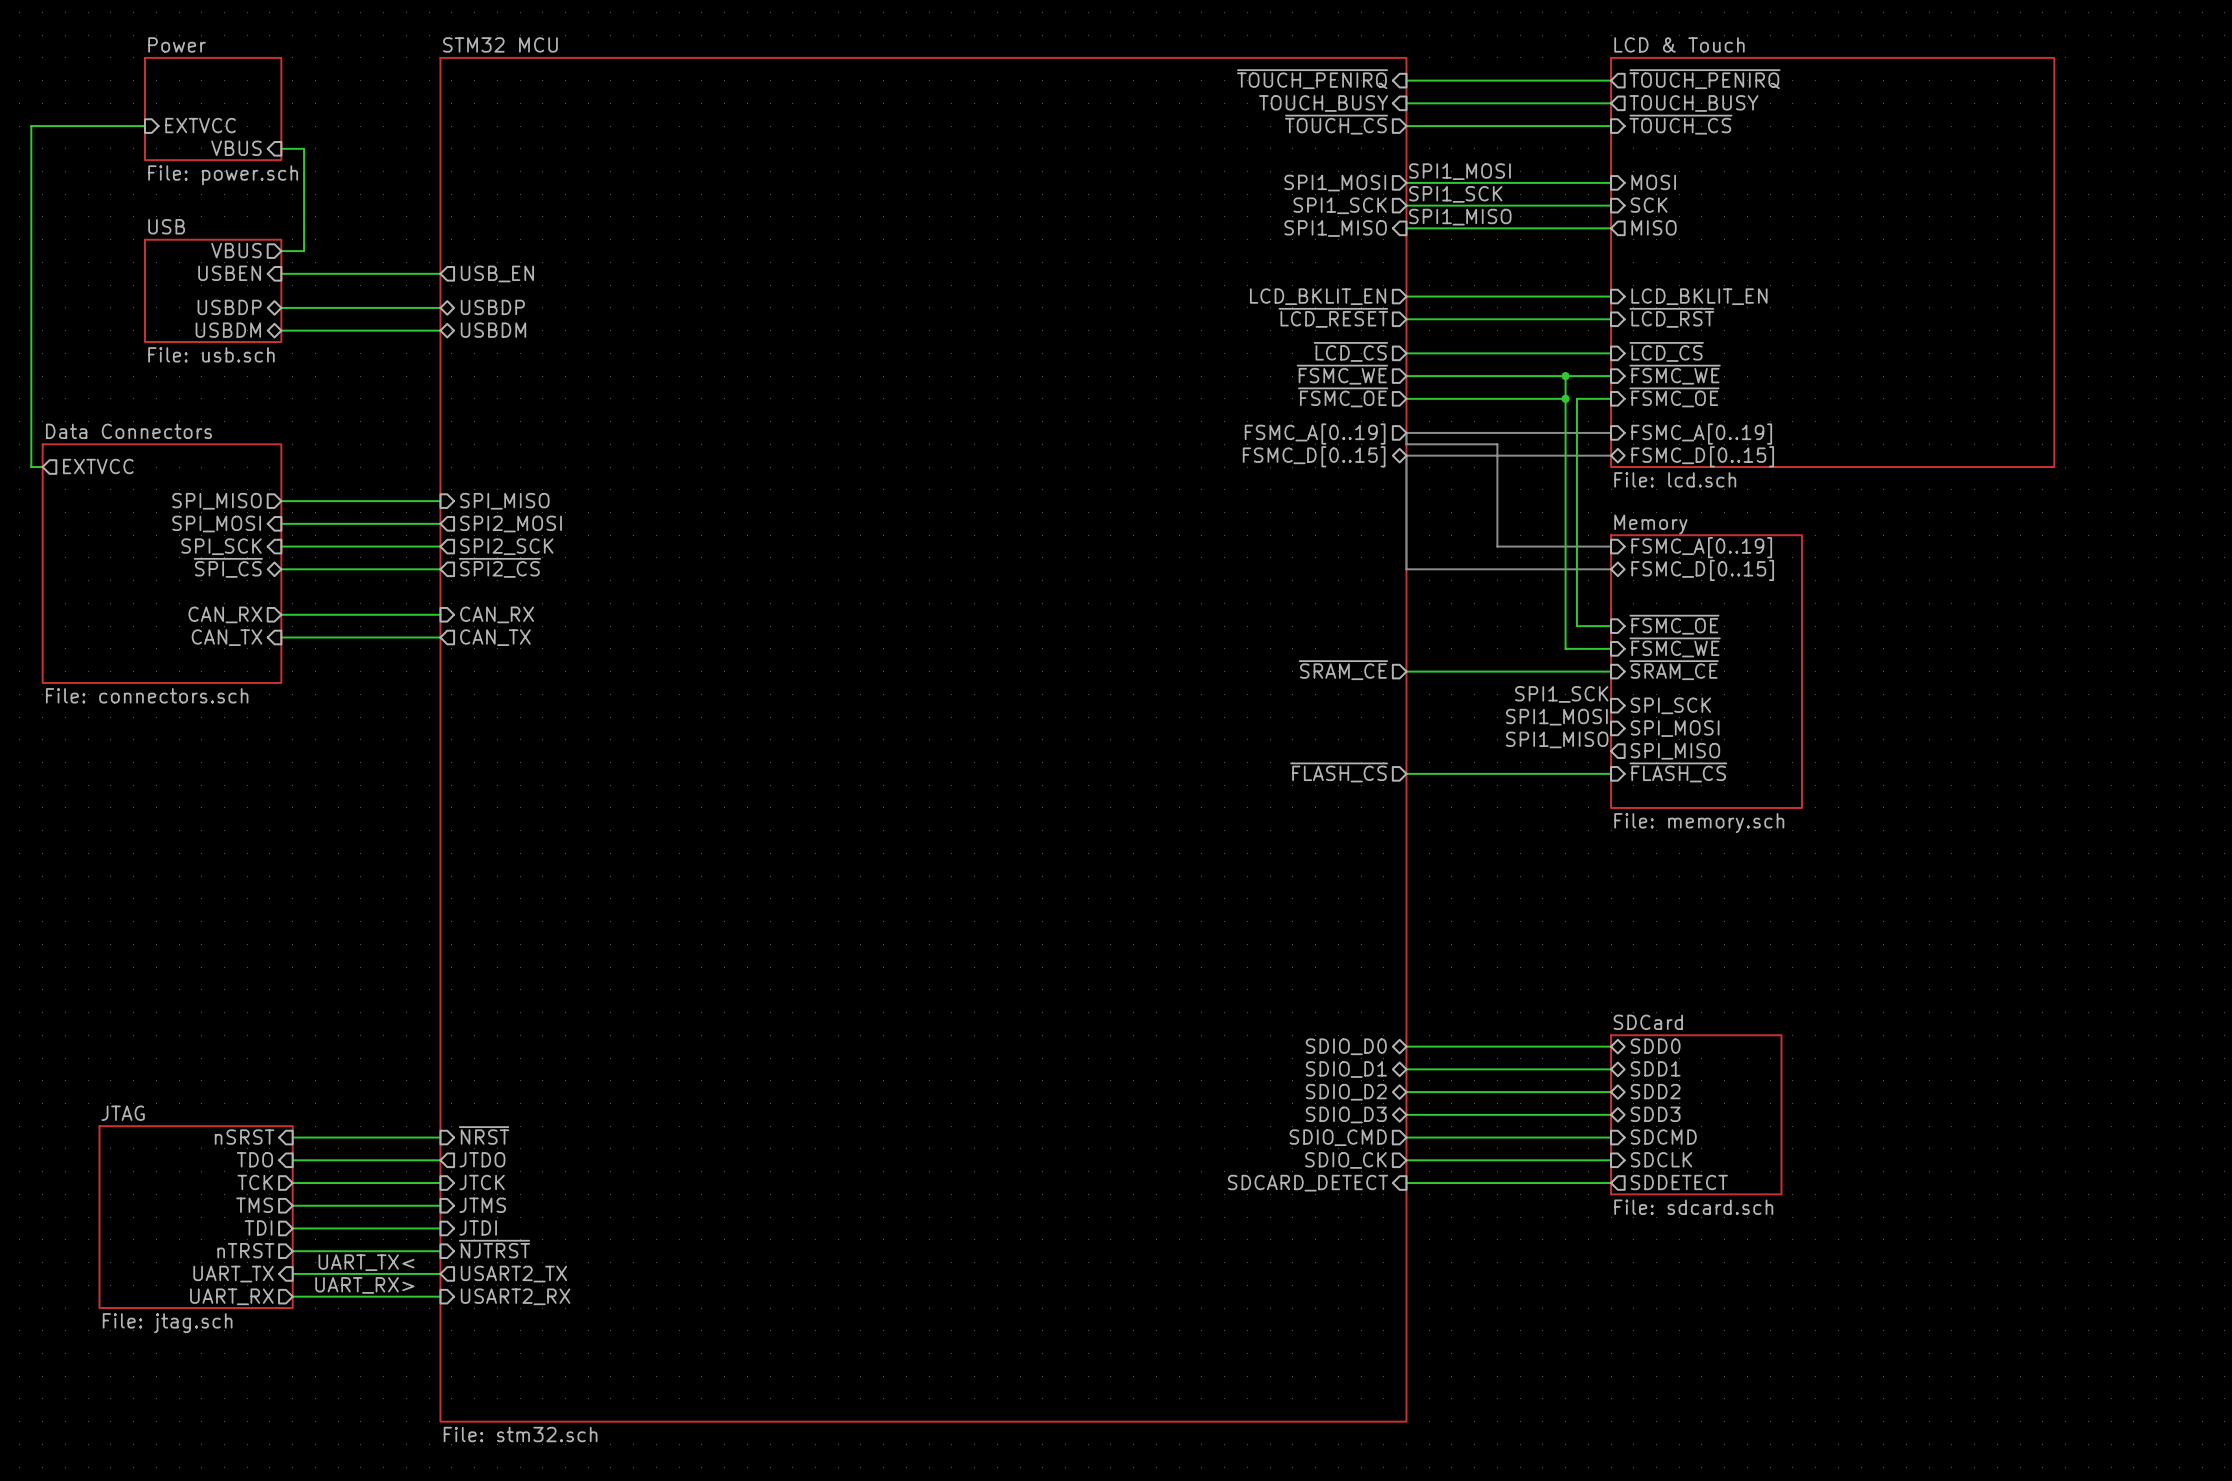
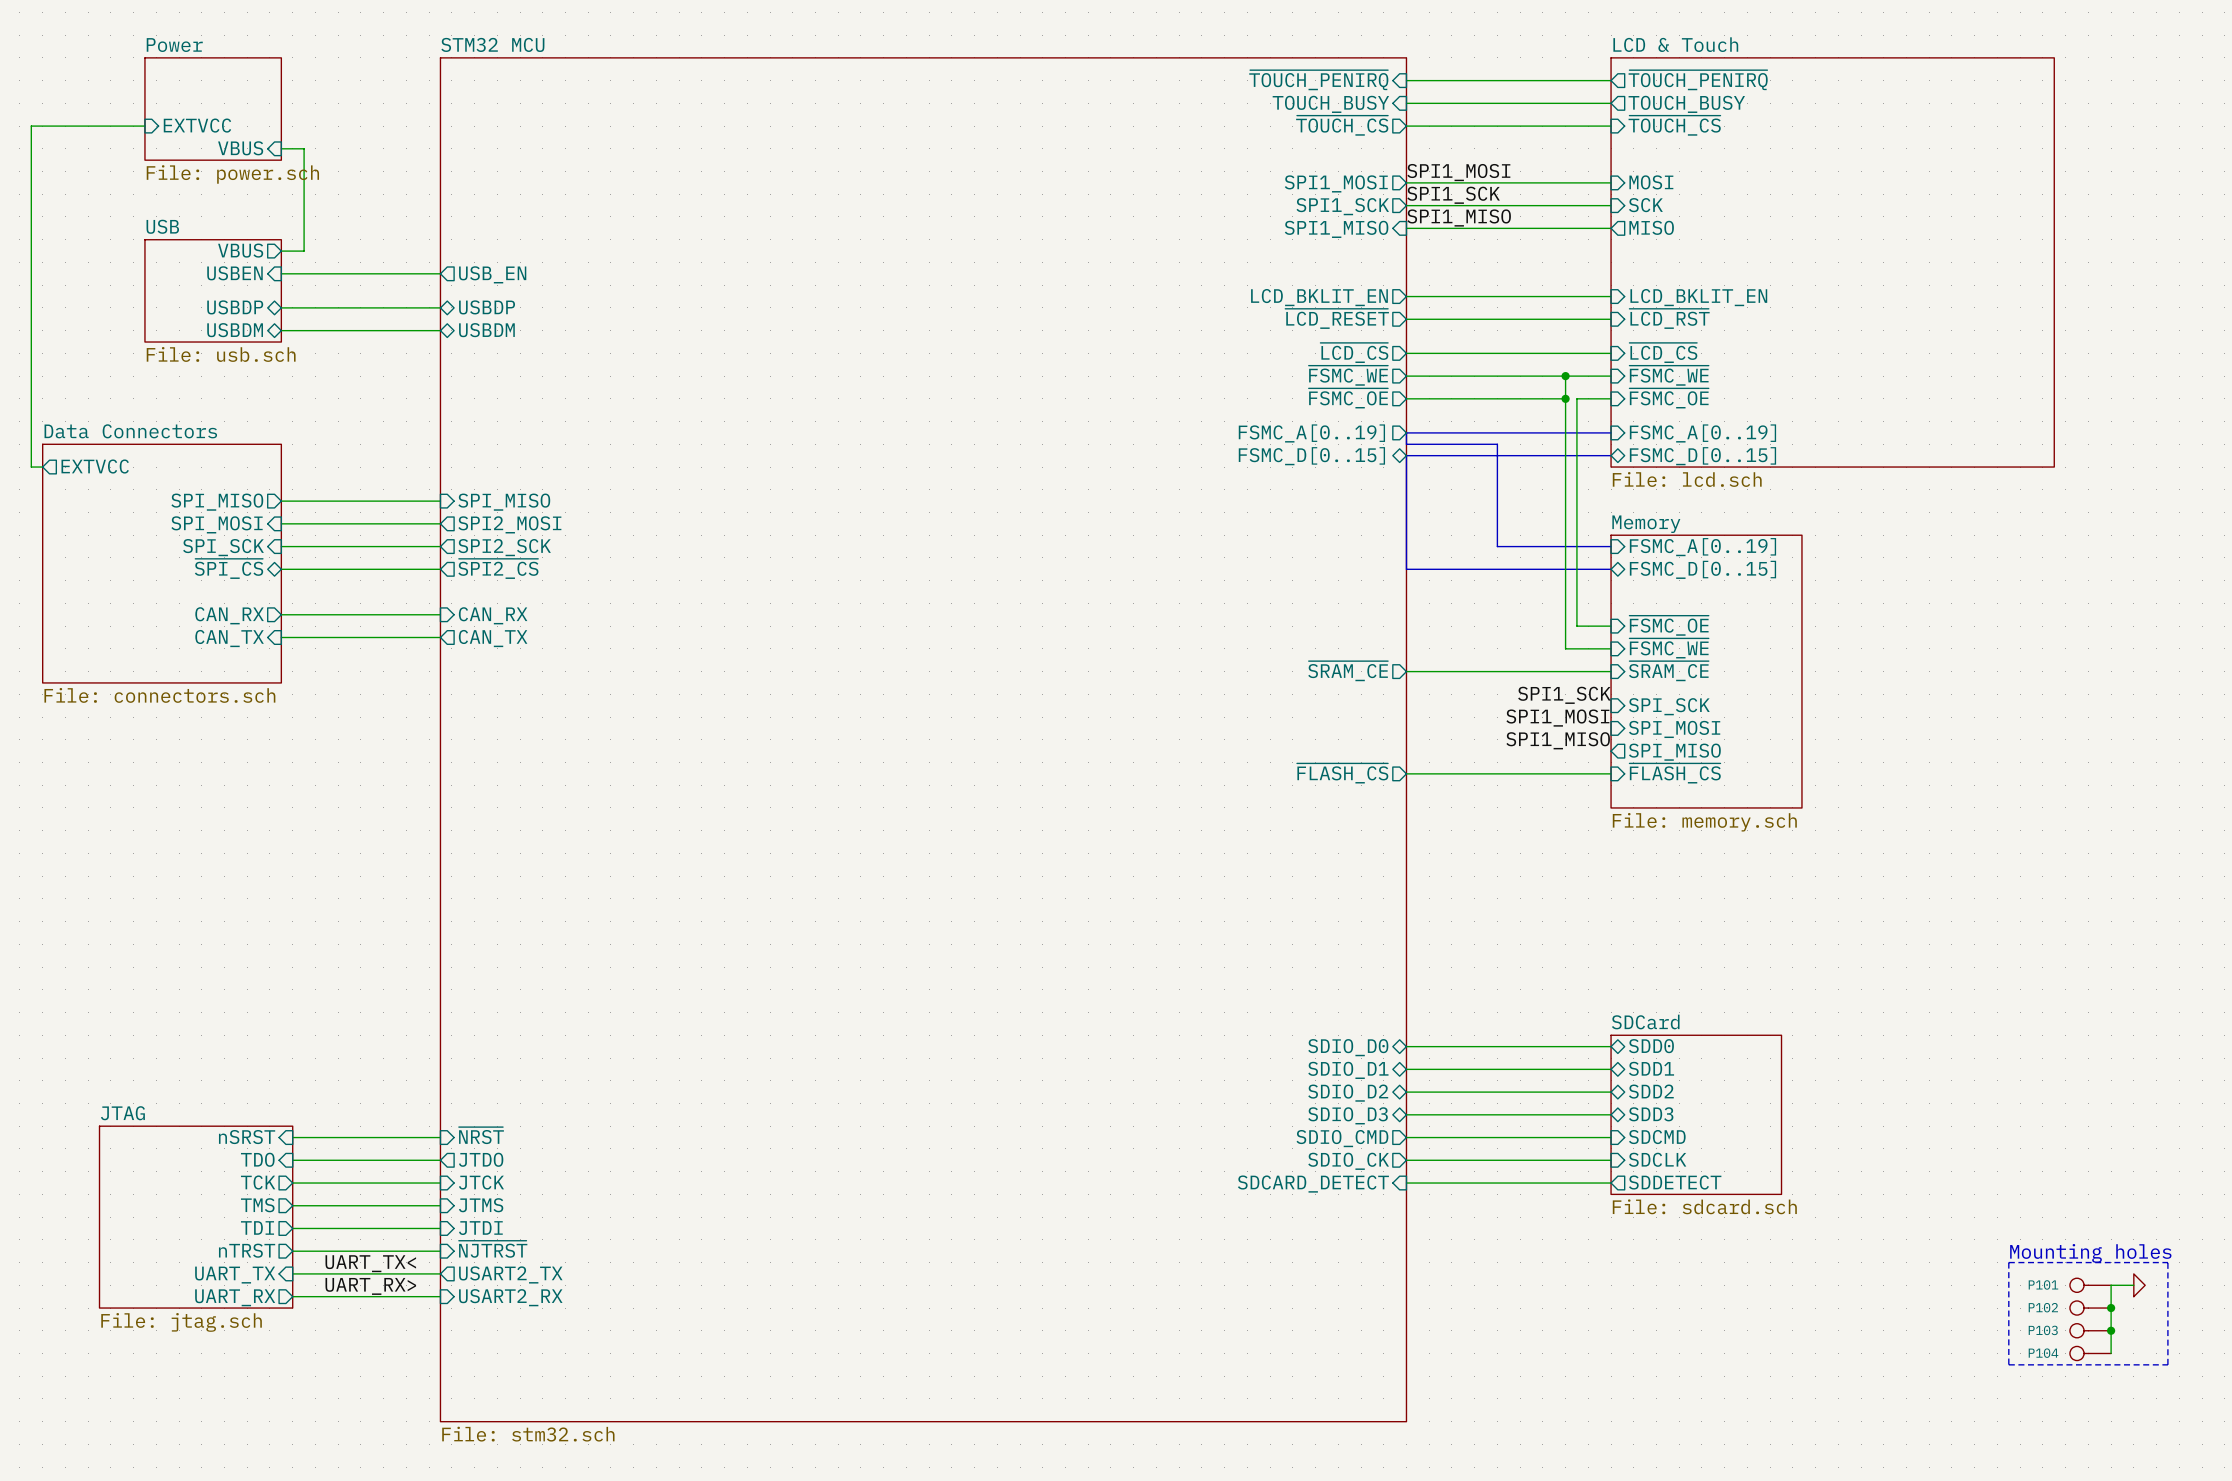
text: none -> Mounting holes (2090, 1253)
line: none -> (2008, 1262) (2167, 1262) (2167, 1364) (2008, 1364) (2008, 1262)
P101: none -> (2090, 1285)
wire: none -> (2133, 1285) (2111, 1285) (2111, 1353)
power symbol: none -> (2139, 1285)
P102: none -> (2090, 1308)
junction: none -> (2111, 1308)
P103: none -> (2090, 1330)
junction: none -> (2111, 1330)
P104: none -> (2090, 1353)

